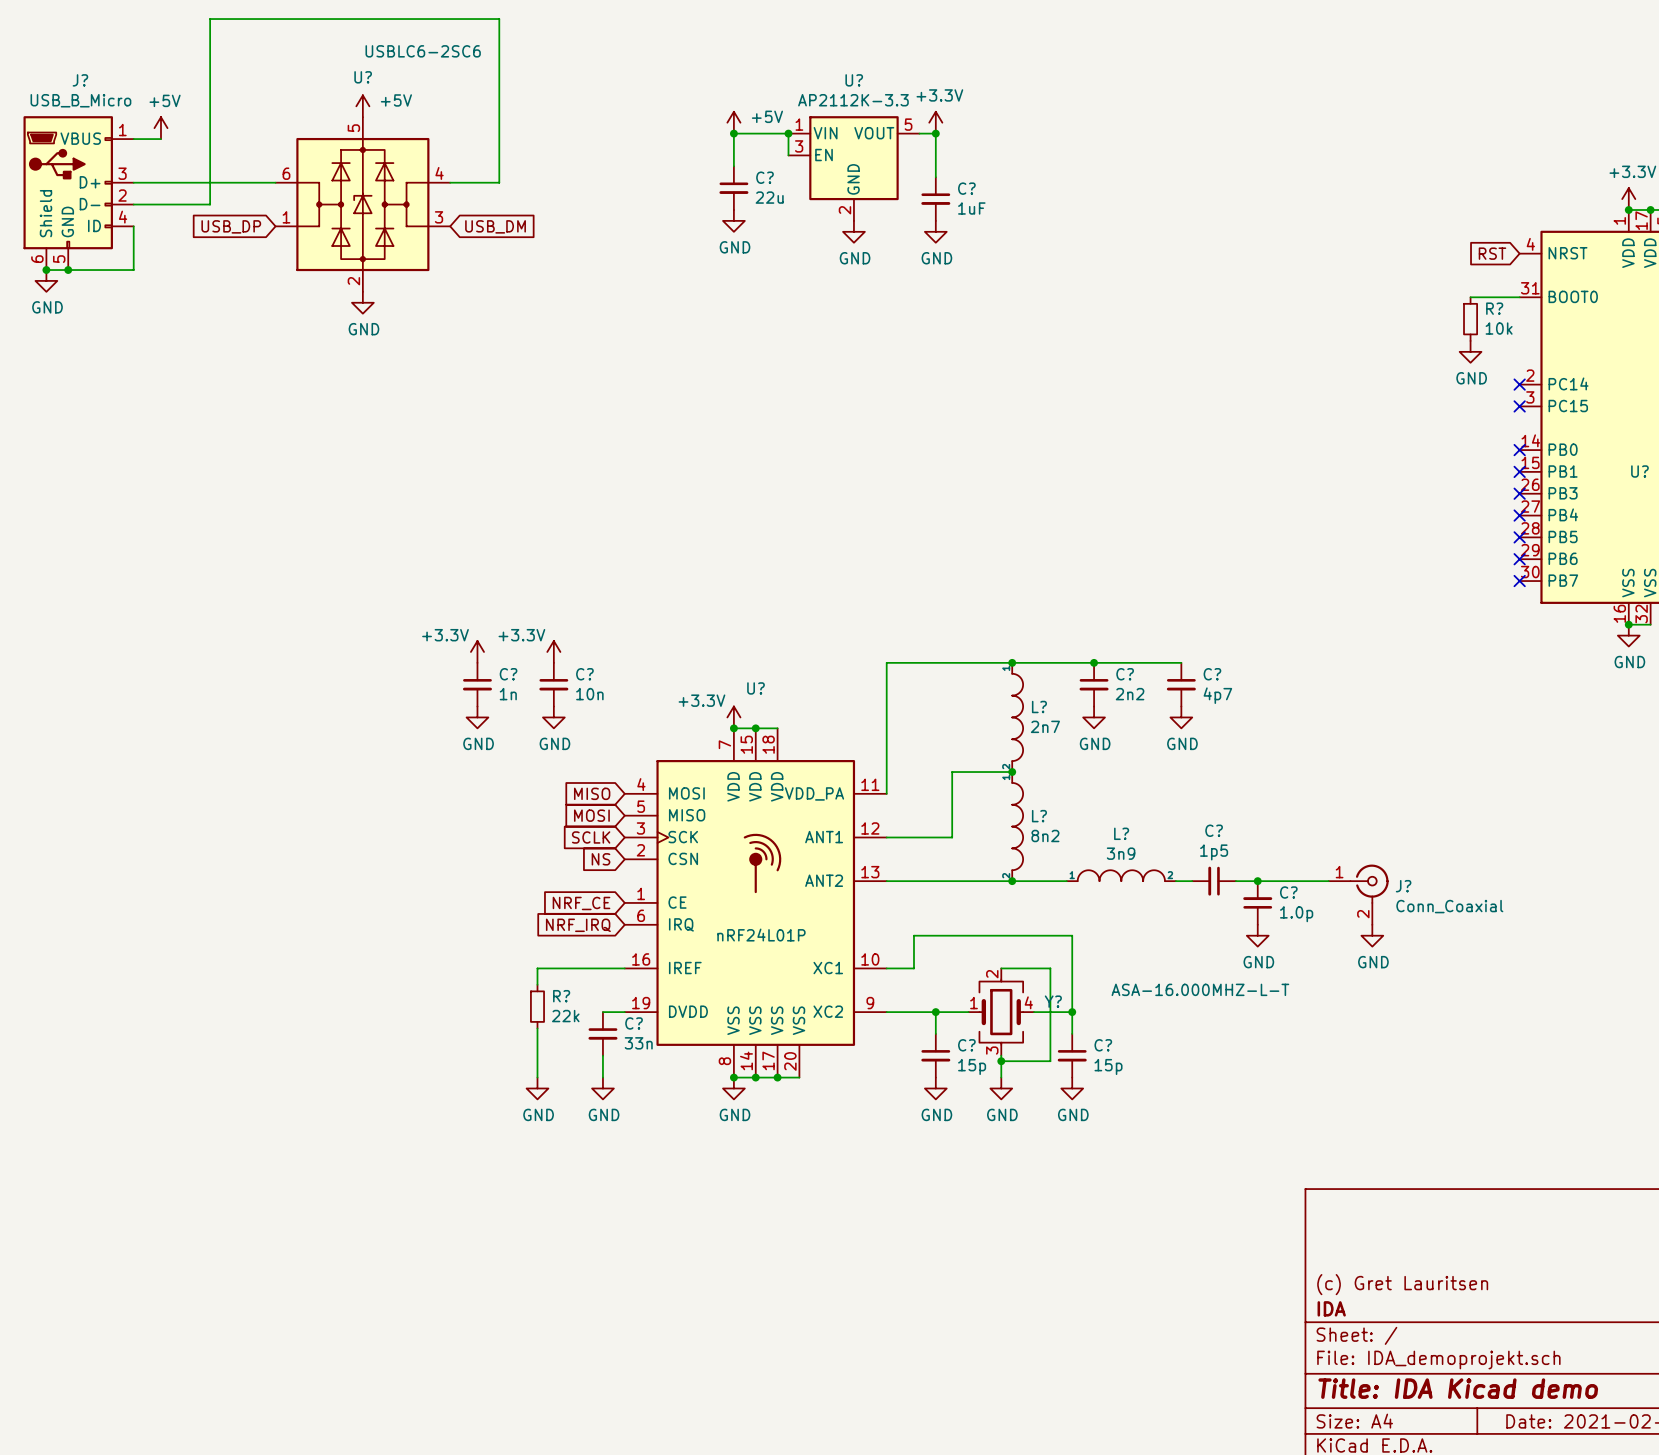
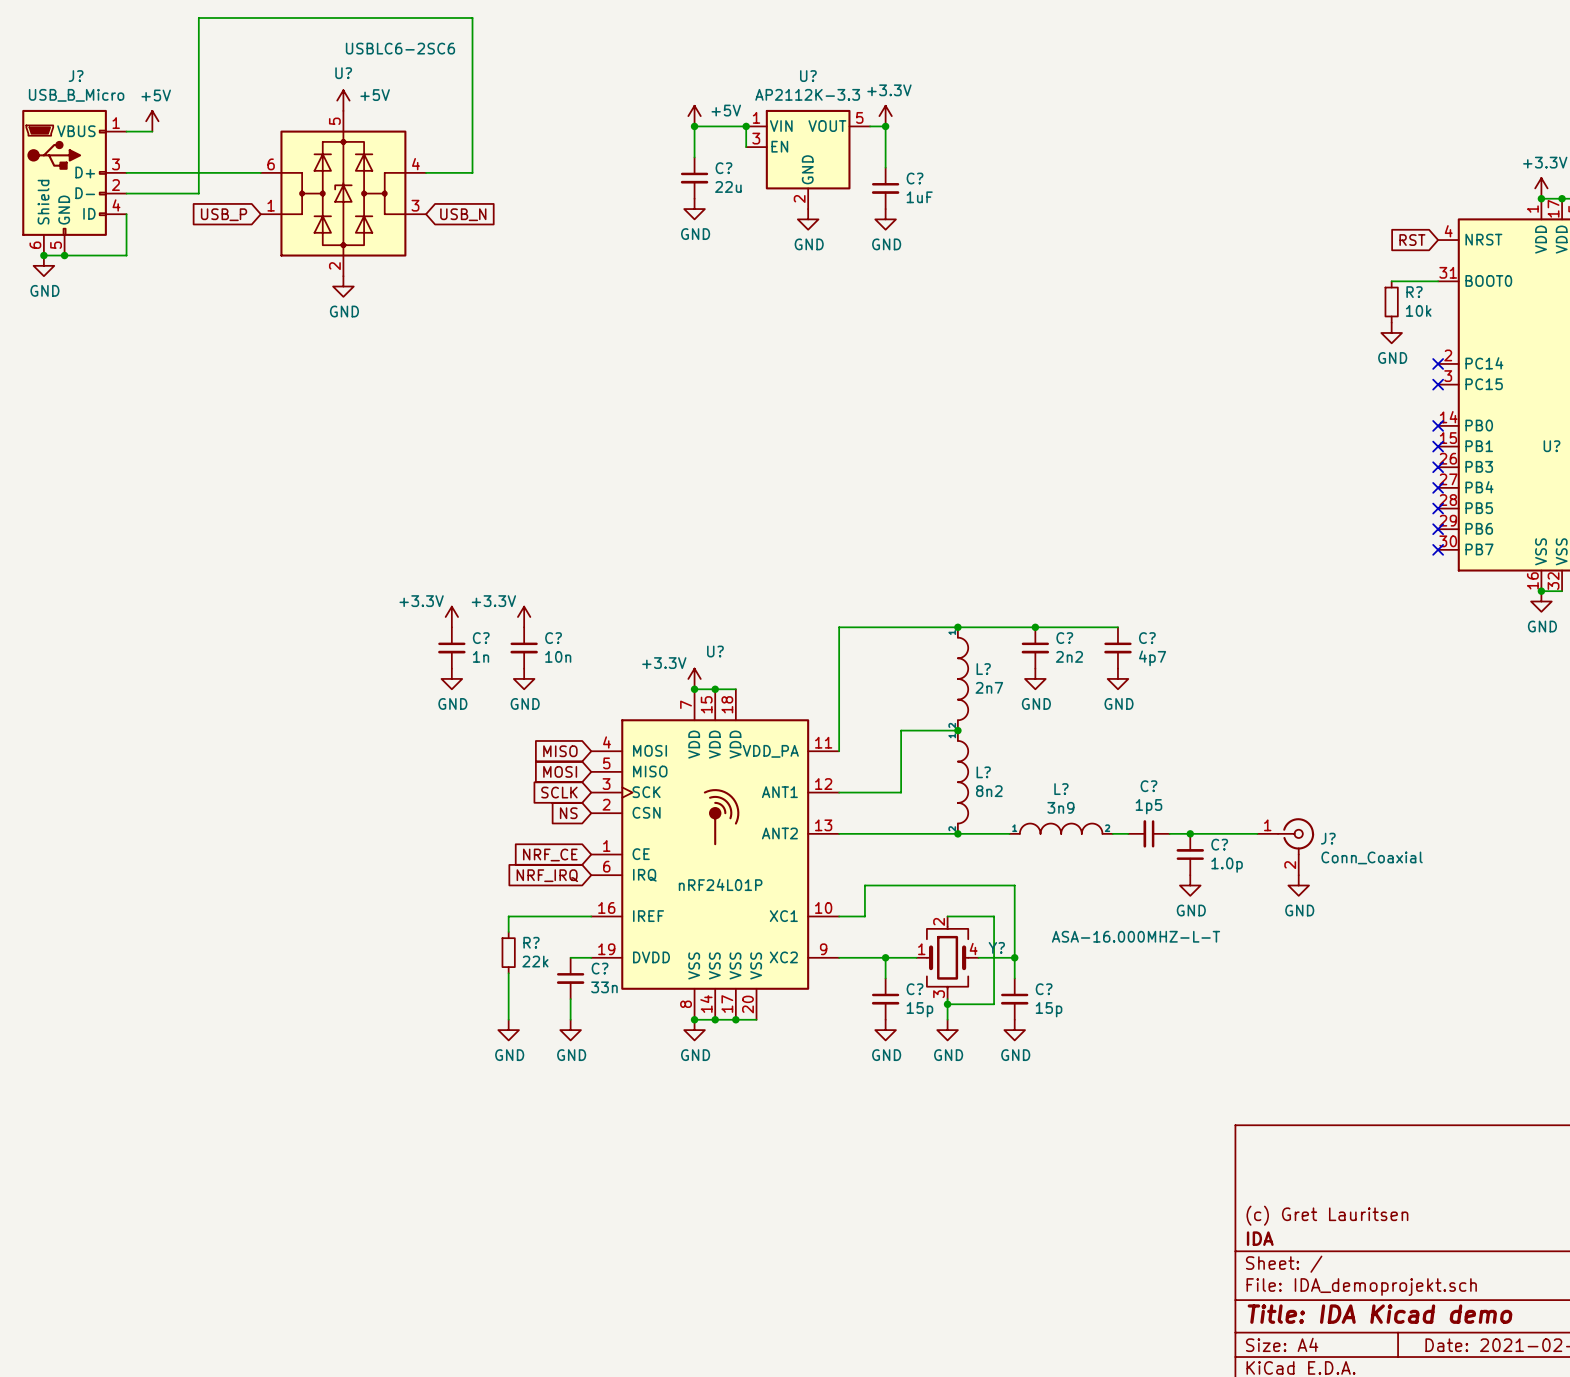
global label: USB_DP (231, 226) -> USB_P (224, 214)
global label: USB_DM (495, 226) -> USB_N (463, 214)

